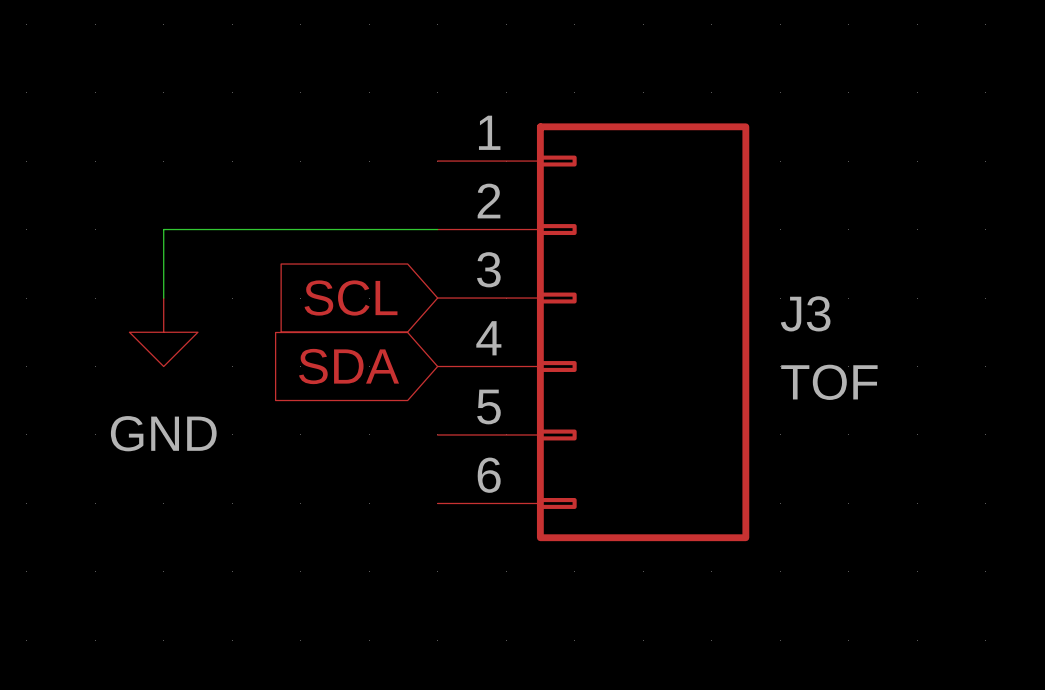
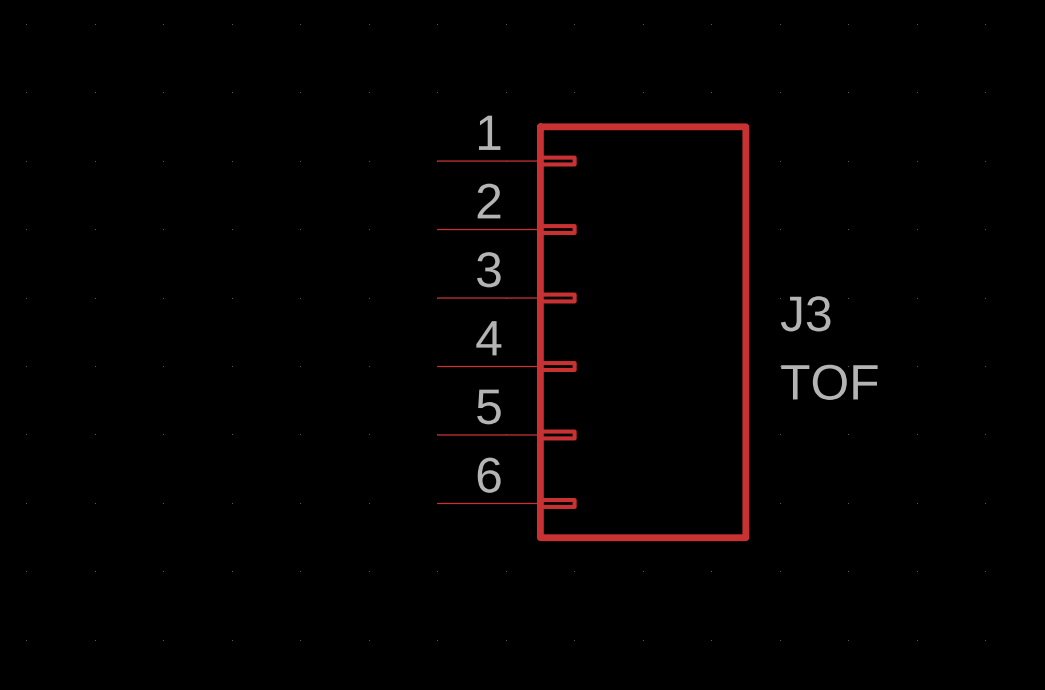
wire: (437, 229) (163, 229) (163, 298) -> none
global label: SCL (351, 298) -> none
power symbol: GND (163, 332) -> none
global label: SDA (349, 366) -> none

